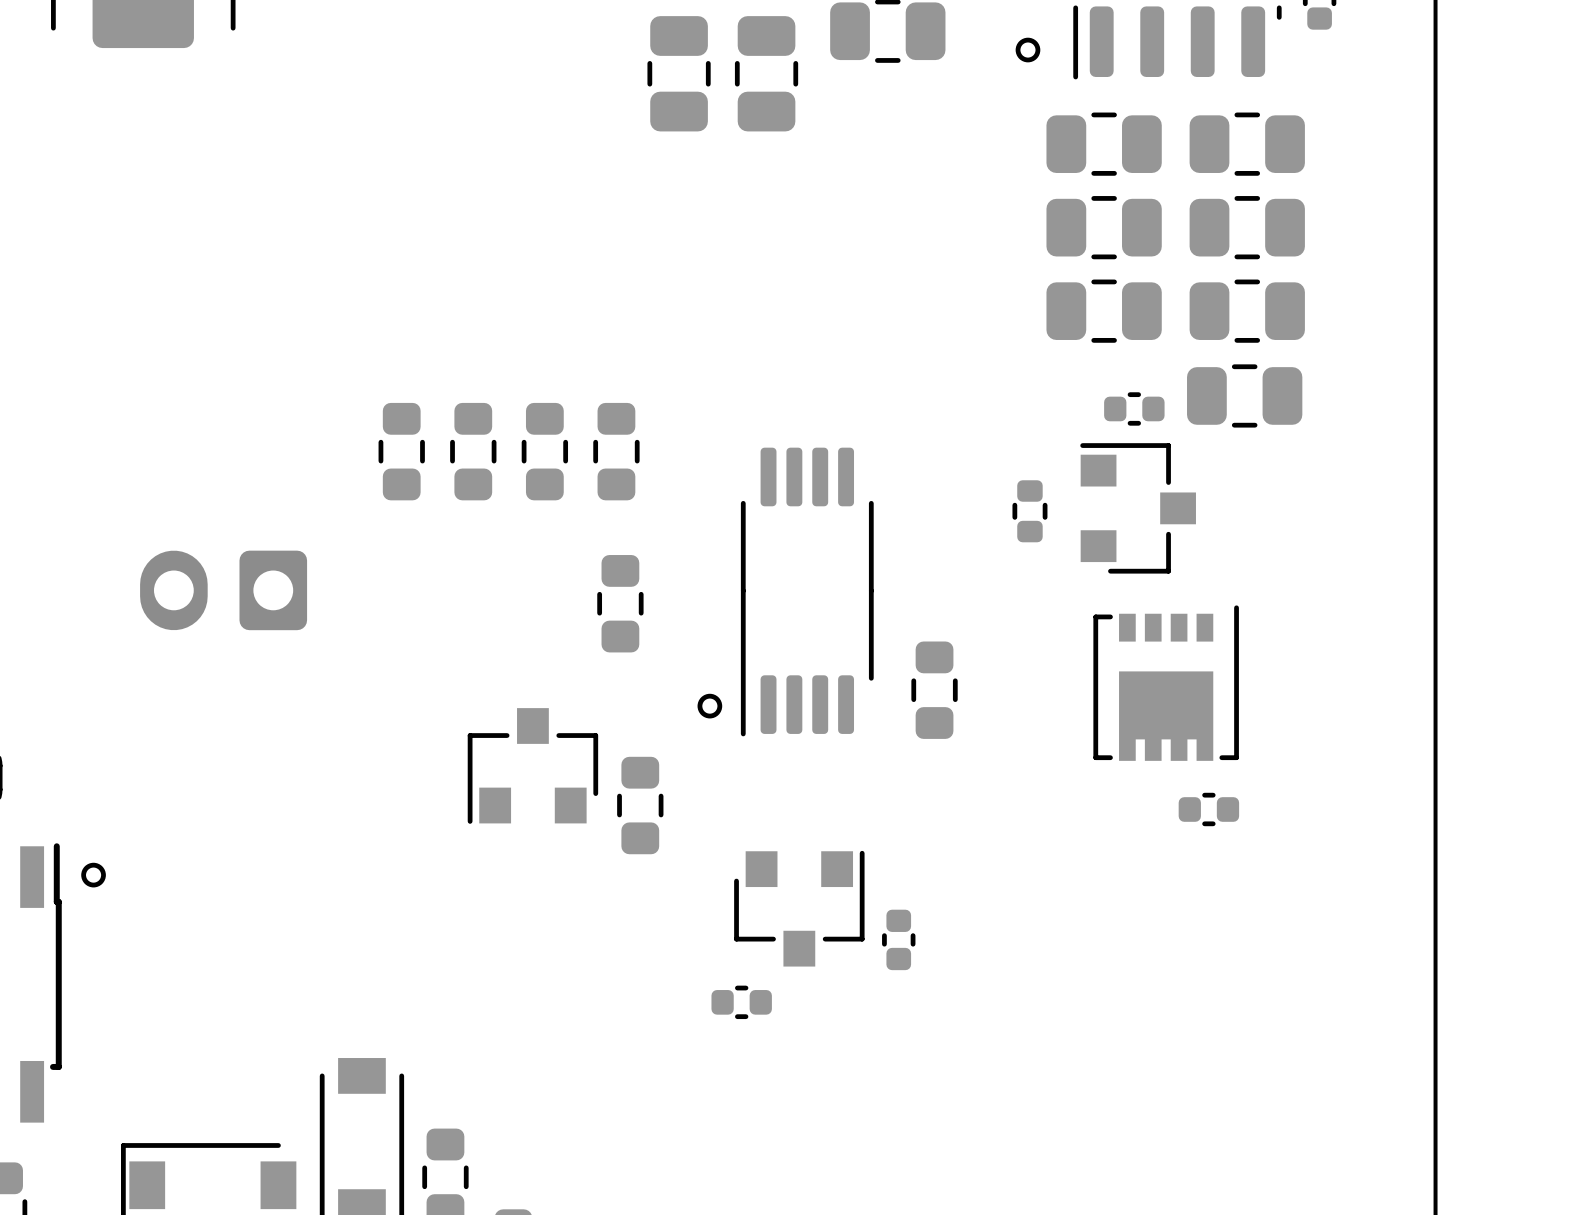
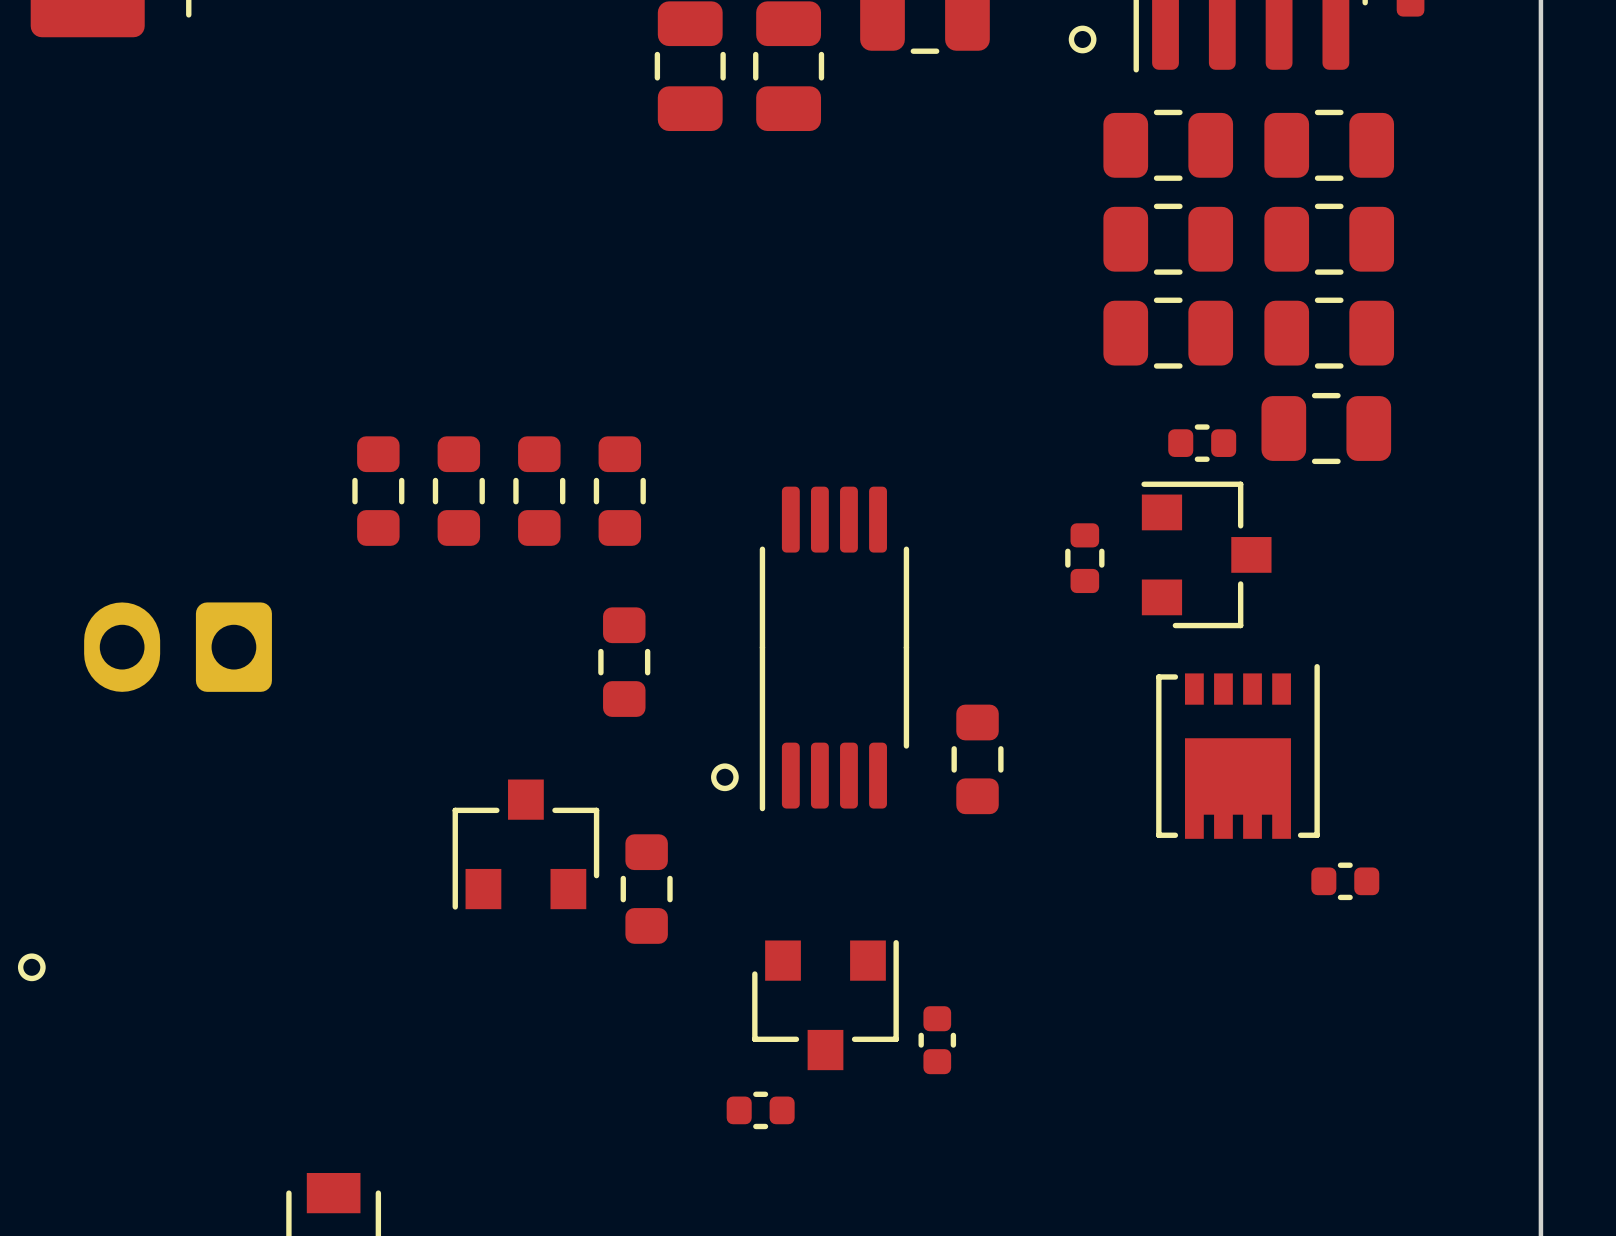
part position: (1208, 809) -> (1345, 881)

